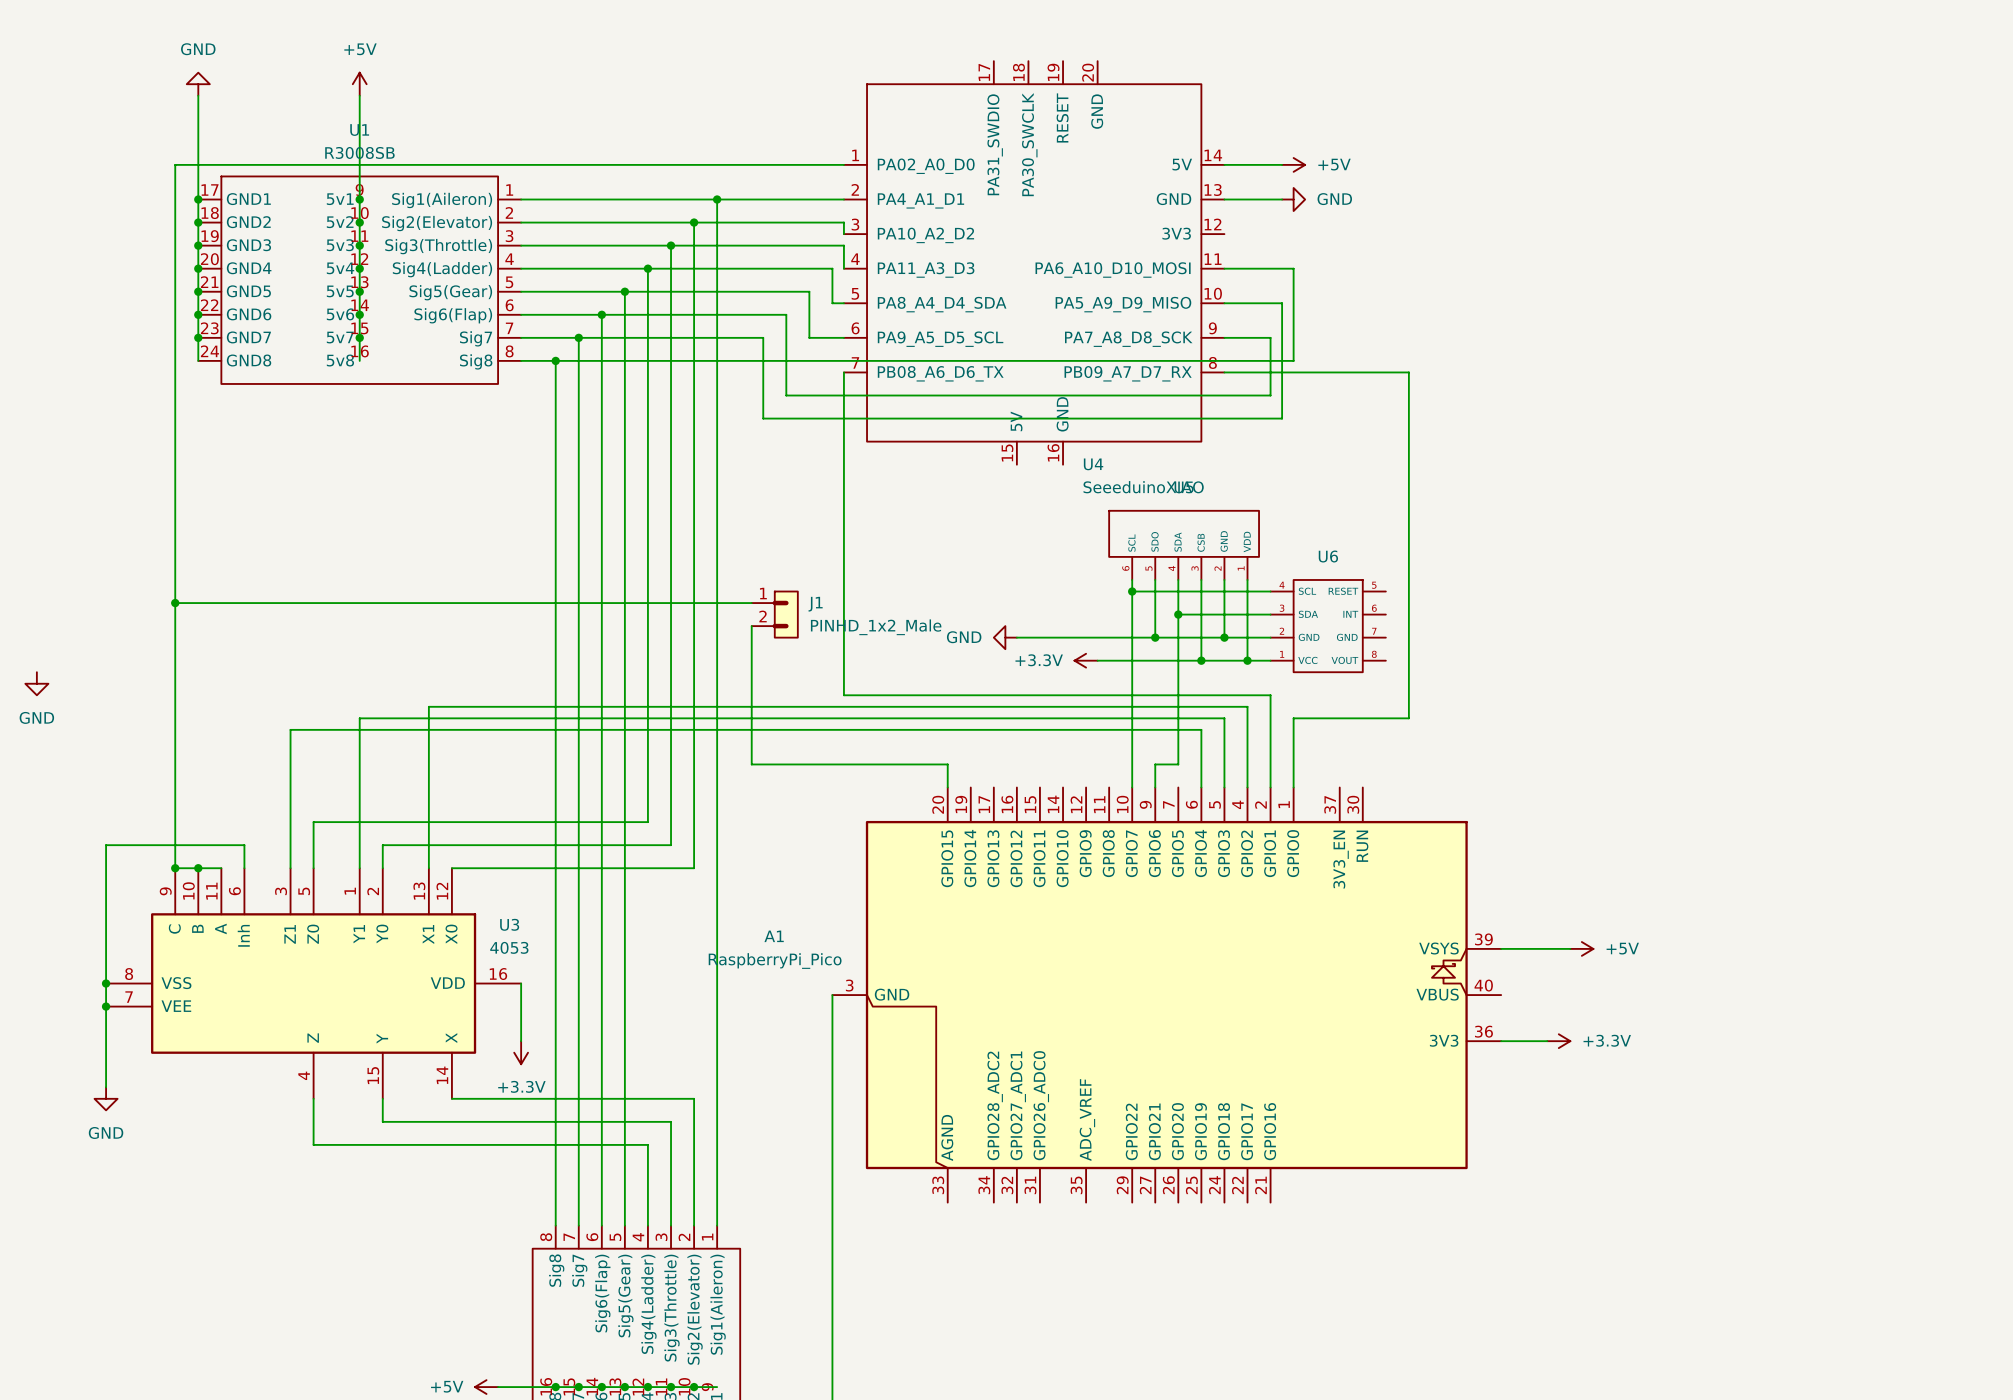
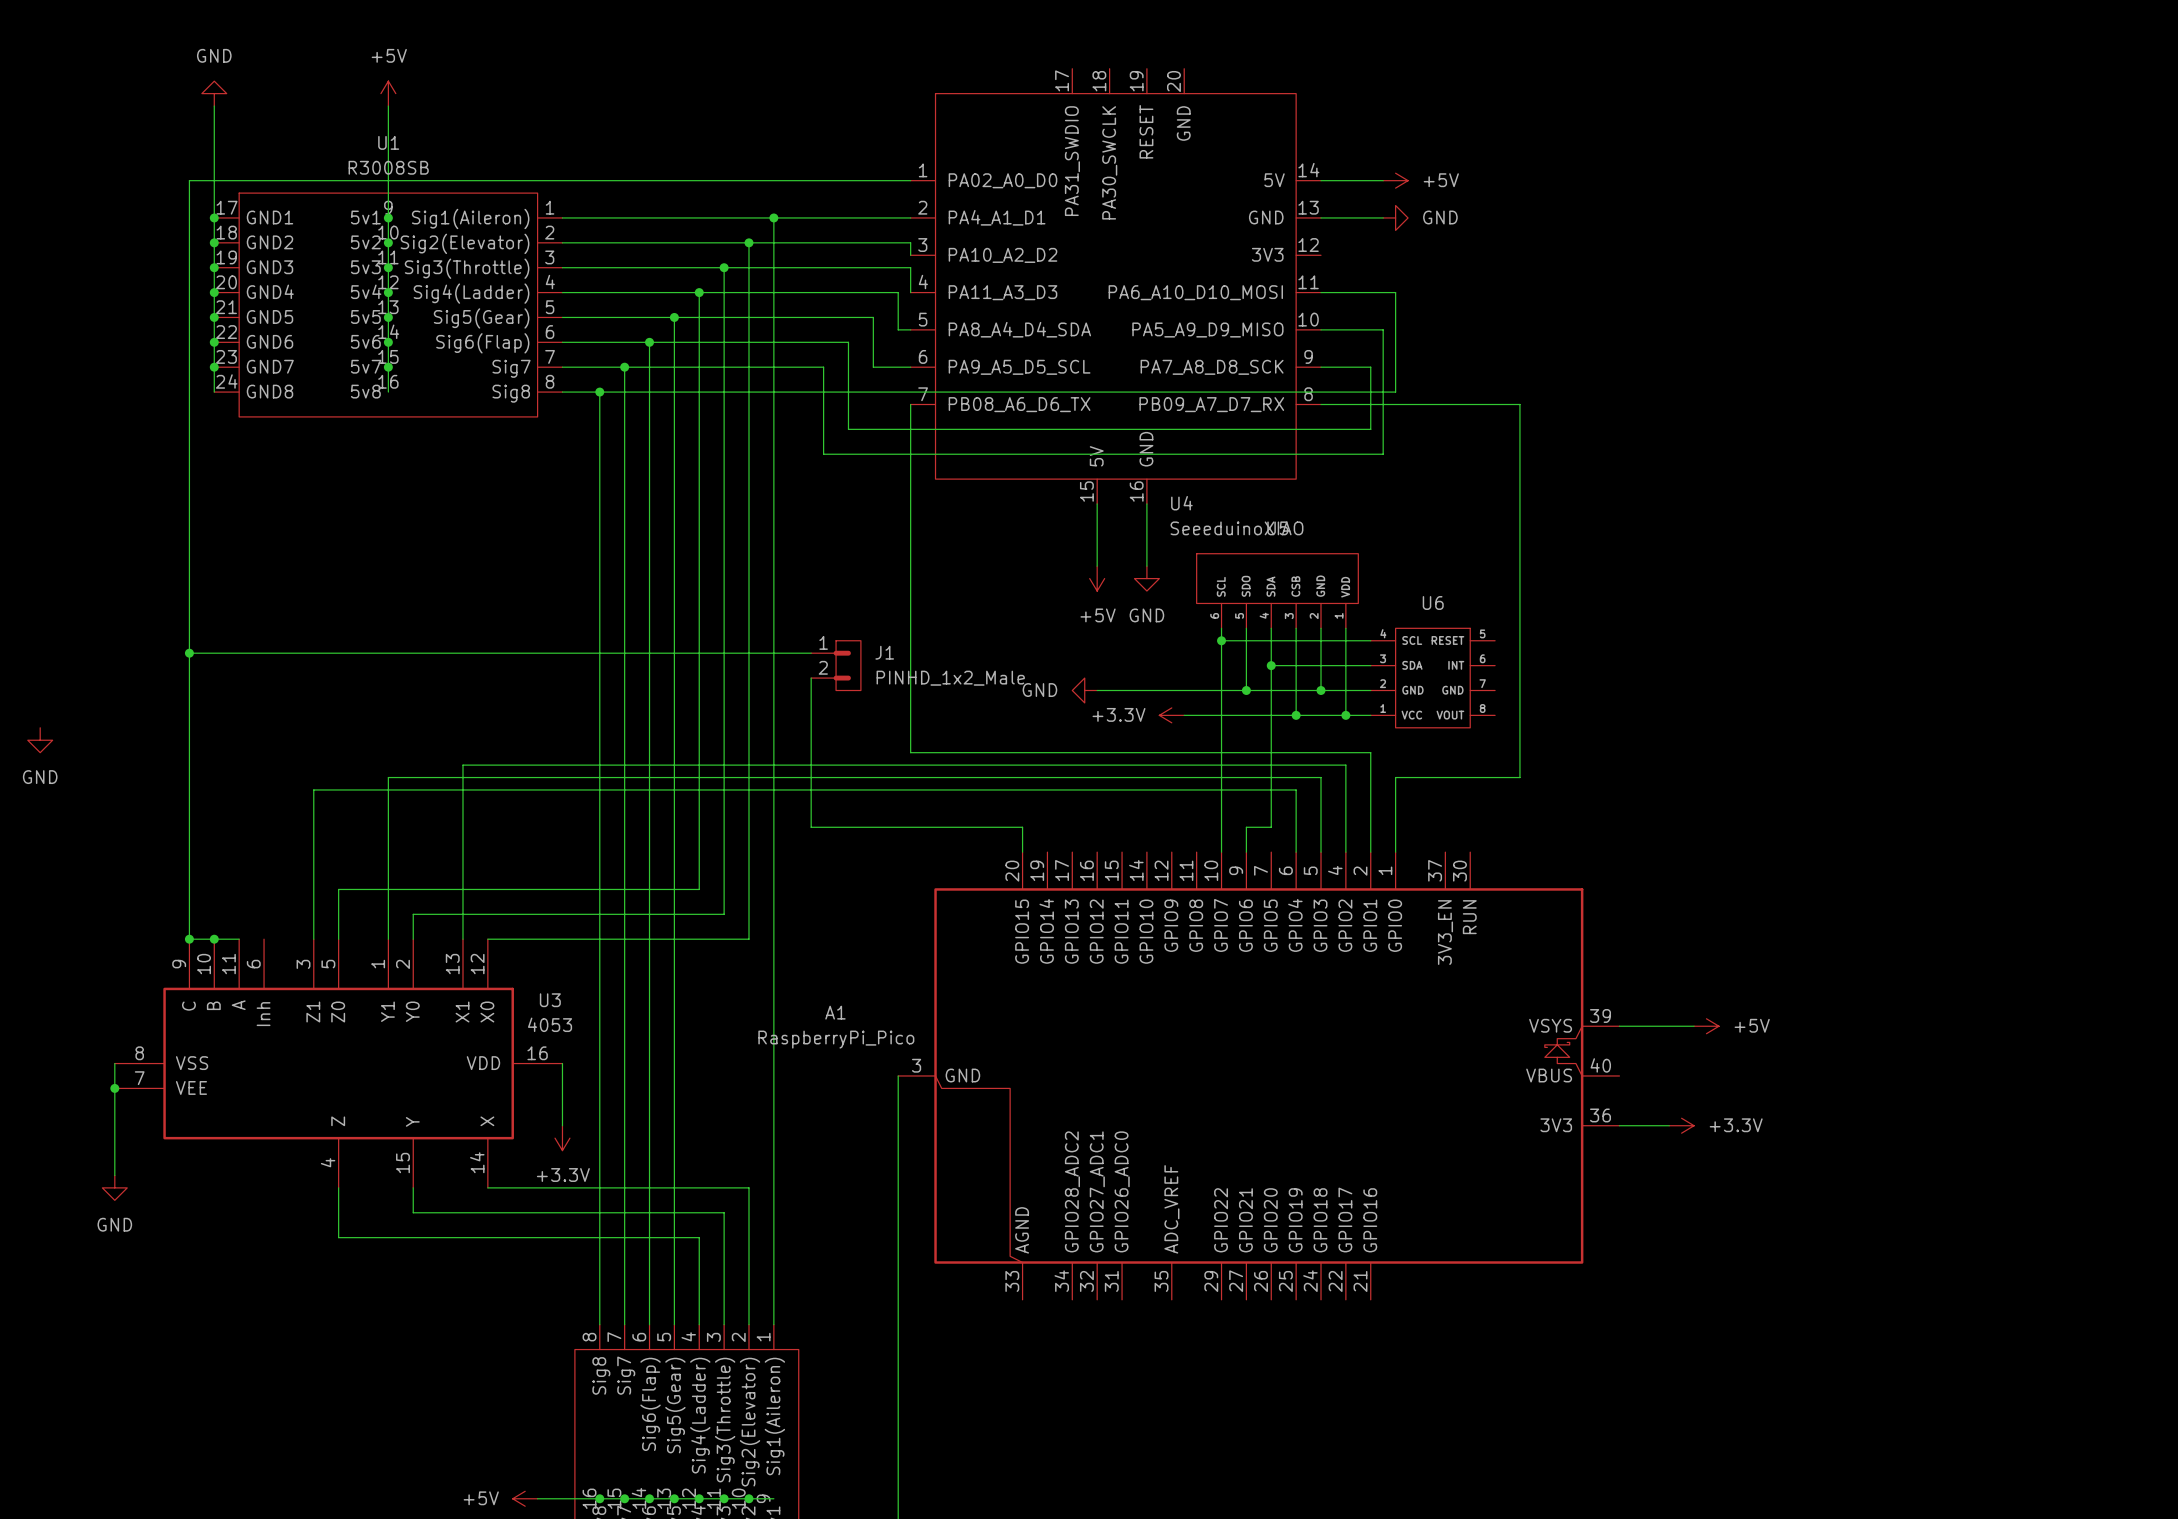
wire: none -> (1097, 503) (1097, 566)
wire: none -> (1146, 503) (1146, 566)
power symbol: none -> +5V (1097, 578)
power symbol: none -> GND (1146, 578)
wire: (244, 868) (244, 845) (106, 845) (106, 983) -> none
junction: (106, 983) -> none

